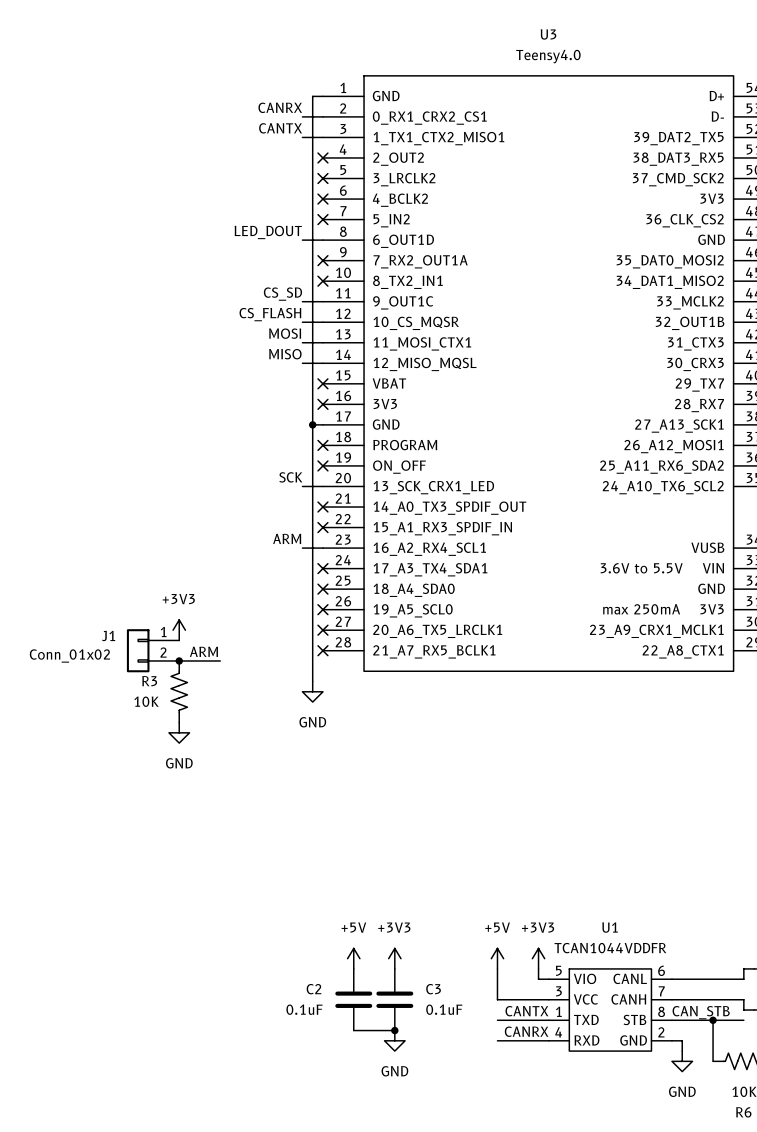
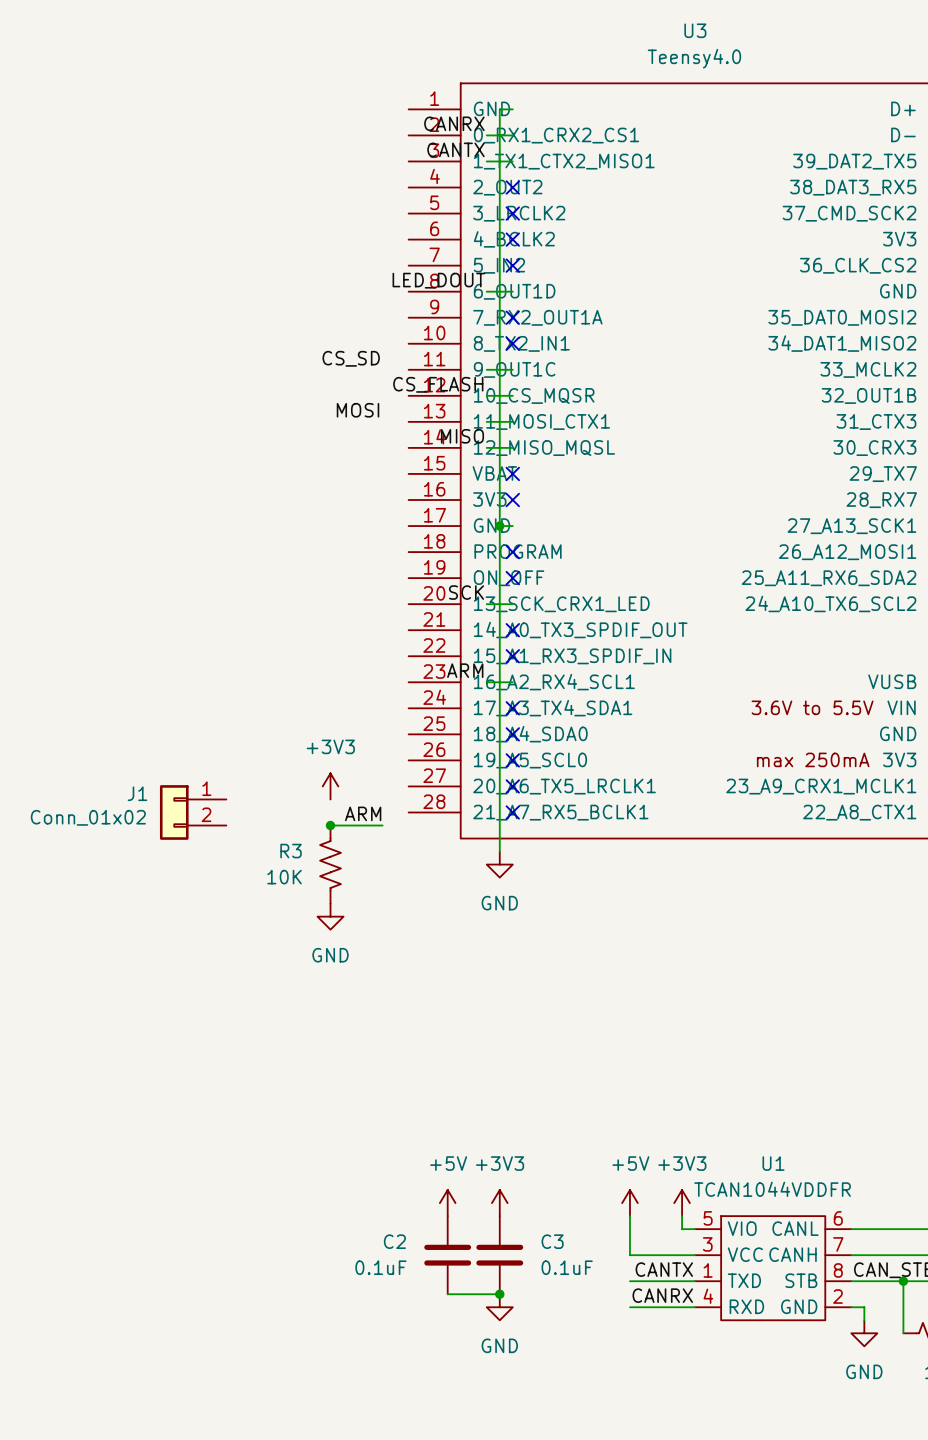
wire: (322, 96) (312, 96) (312, 681) -> (512, 109) (499, 109) (499, 851)
label position: CANRX (280, 107) -> CANRX (454, 123)
wire: (302, 116) (322, 116) -> (486, 135) (512, 135)
label position: CANTX (280, 128) -> CANTX (455, 149)
wire: (302, 137) (322, 137) -> (486, 161) (512, 161)
no-connect mark: (322, 157) -> none
no-connect mark: none -> (512, 187)
no-connect mark: (322, 178) -> none
no-connect mark: none -> (512, 213)
no-connect mark: (322, 199) -> none
no-connect mark: none -> (512, 239)
no-connect mark: (322, 219) -> none
no-connect mark: none -> (512, 265)
label position: LED_DOUT (268, 232) -> LED_DOUT (438, 280)
wire: (302, 240) (322, 240) -> (486, 291) (512, 291)
no-connect mark: (322, 260) -> none
no-connect mark: none -> (512, 317)
no-connect mark: (322, 281) -> none
no-connect mark: none -> (512, 343)
wire: (302, 301) (322, 301) -> (486, 369) (512, 369)
label position: CS_FLASH (270, 314) -> CS_FLASH (438, 384)
wire: (302, 322) (322, 322) -> (486, 395) (512, 395)
wire: (302, 342) (322, 342) -> (486, 421) (512, 421)
label position: MISO (285, 354) -> MISO (462, 436)
wire: (302, 363) (322, 363) -> (486, 447) (512, 447)
no-connect mark: (322, 383) -> none
no-connect mark: none -> (512, 473)
no-connect mark: (322, 404) -> none
no-connect mark: none -> (512, 500)
wire: (312, 424) (322, 424) -> (499, 526) (512, 526)
junction: (312, 424) -> none
junction: none -> (499, 526)
no-connect mark: (322, 445) -> none
no-connect mark: none -> (512, 552)
no-connect mark: (322, 465) -> none
no-connect mark: none -> (512, 578)
label position: SCK (290, 477) -> SCK (466, 592)
wire: (302, 486) (322, 486) -> (486, 604) (512, 604)
no-connect mark: (322, 507) -> none
no-connect mark: none -> (512, 630)
no-connect mark: (322, 527) -> none
no-connect mark: none -> (512, 656)
label: ARM (287, 538) -> none
label: none -> ARM (465, 670)
wire: (302, 548) (322, 548) -> (486, 682) (512, 682)
no-connect mark: (322, 568) -> none
no-connect mark: none -> (512, 708)
no-connect mark: (322, 589) -> none
no-connect mark: none -> (512, 734)
no-connect mark: (322, 609) -> none
no-connect mark: none -> (512, 760)
power symbol position: +3V3 (179, 630) -> +3V3 (330, 786)
no-connect mark: (322, 630) -> none
no-connect mark: none -> (512, 786)
no-connect mark: (322, 650) -> none
no-connect mark: none -> (512, 812)
label: ARM (203, 651) -> none
label: none -> ARM (363, 813)
wire: (179, 660) (220, 660) -> (330, 825) (382, 825)
junction: (179, 660) -> none
junction: none -> (330, 825)
R3 position: (179, 691) -> (330, 864)
power symbol: GND (312, 691) -> none
power symbol: none -> GND (499, 864)
power symbol: GND (179, 732) -> none
power symbol: none -> GND (330, 916)

